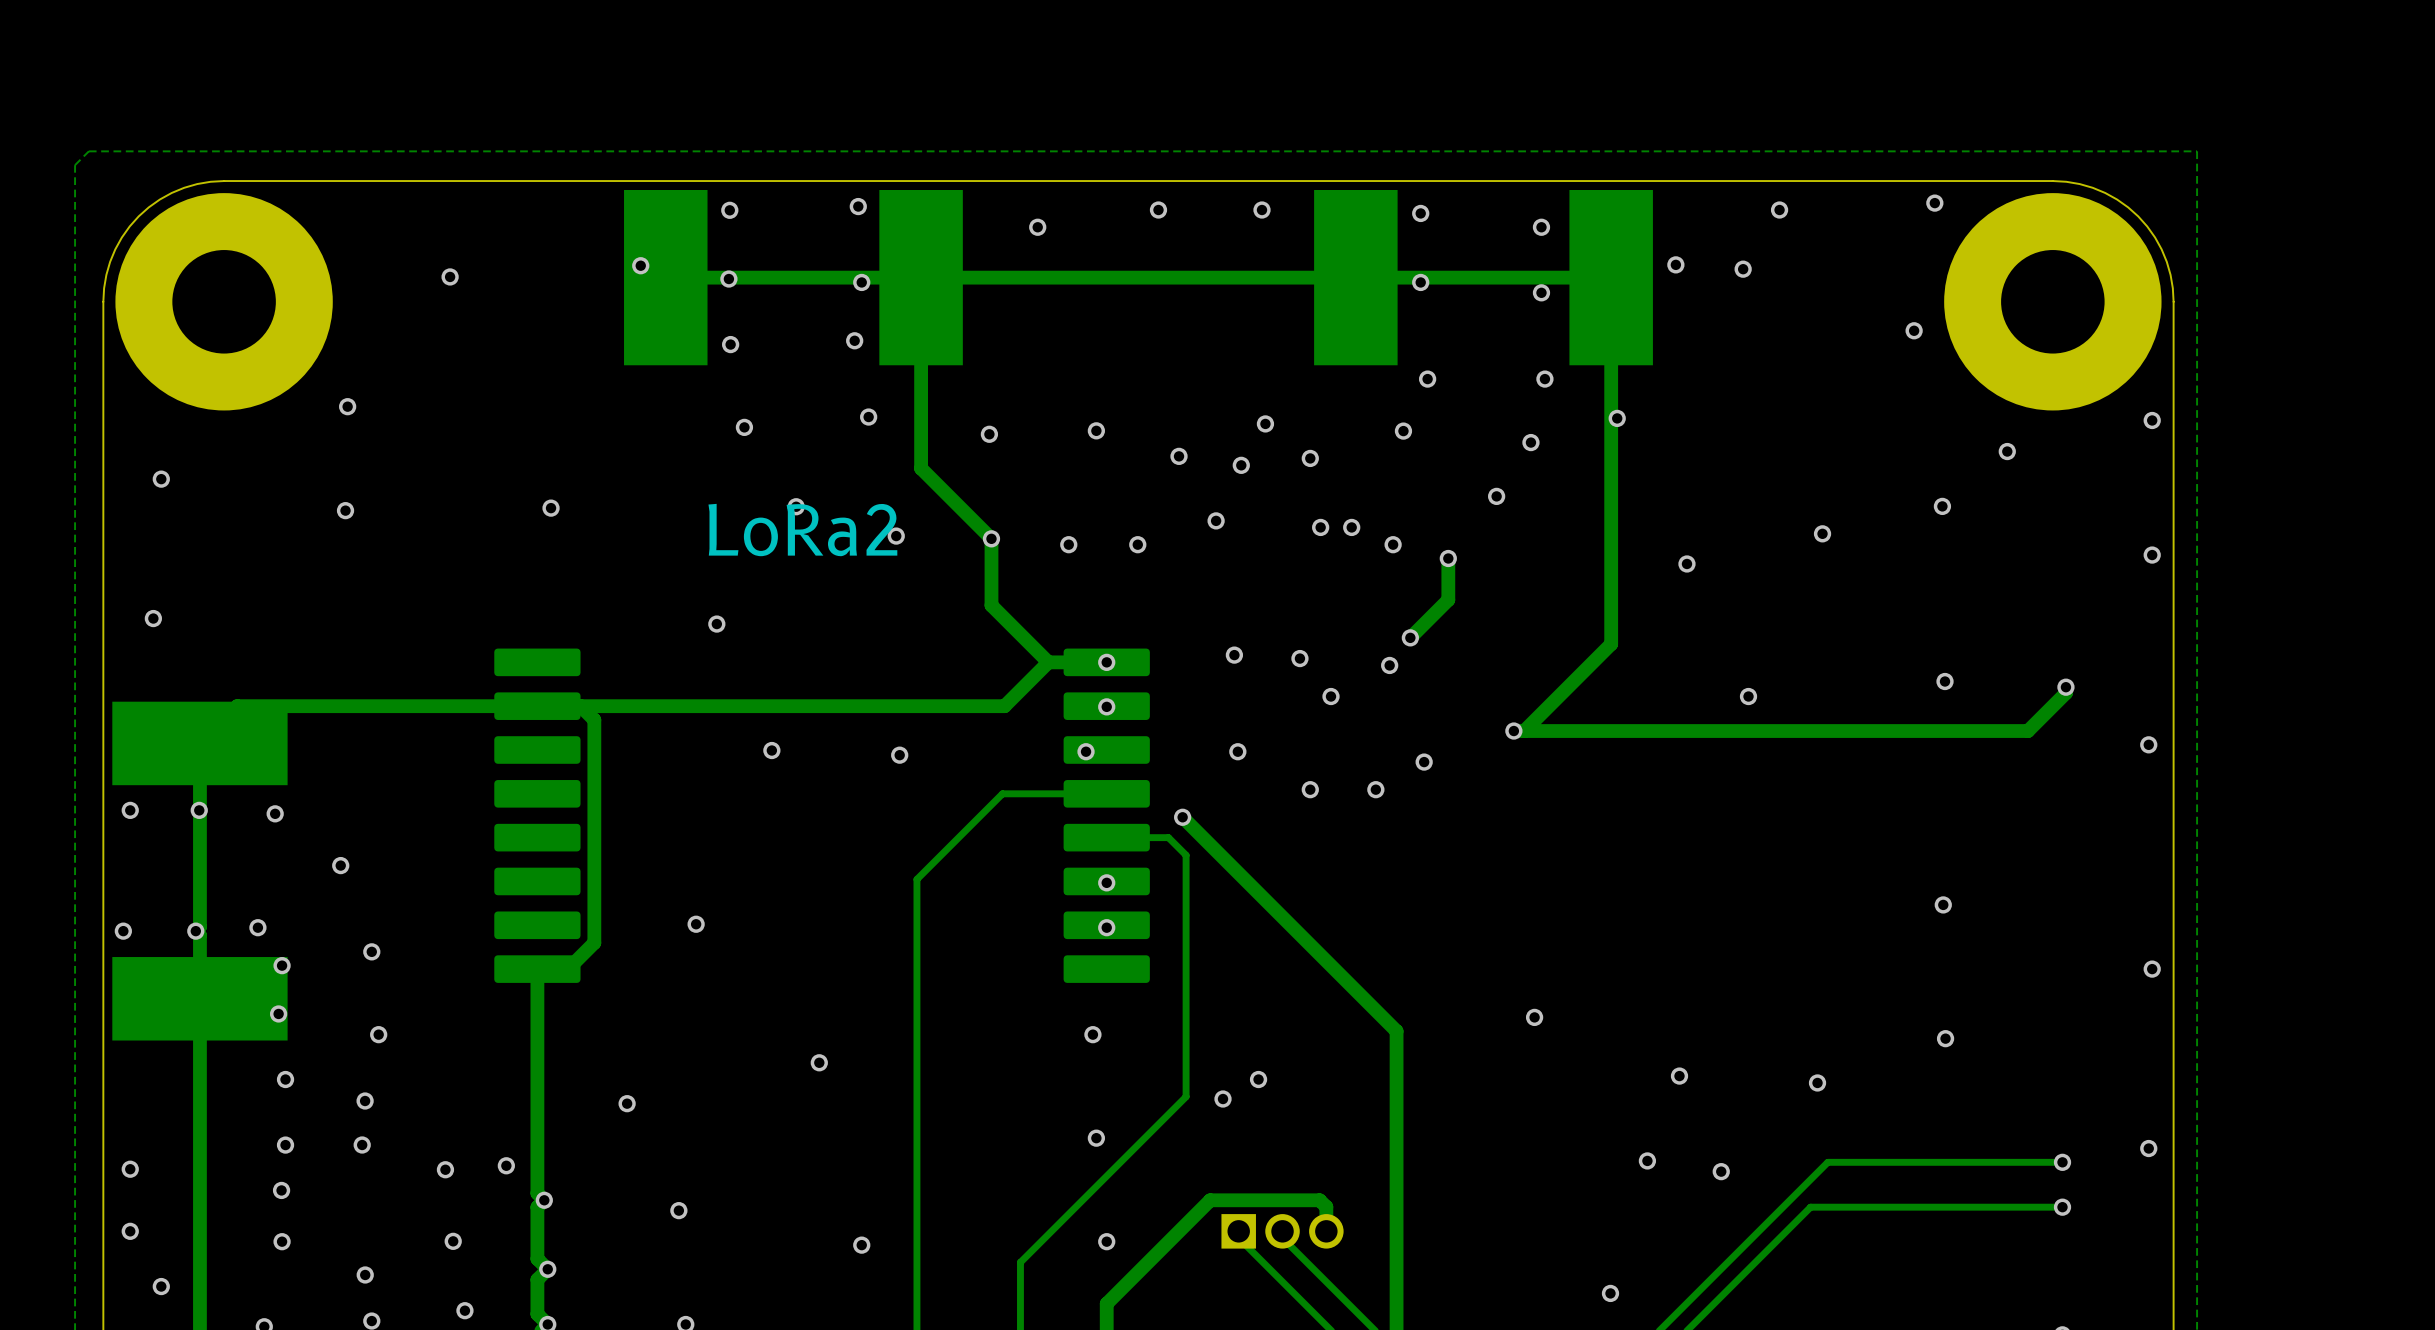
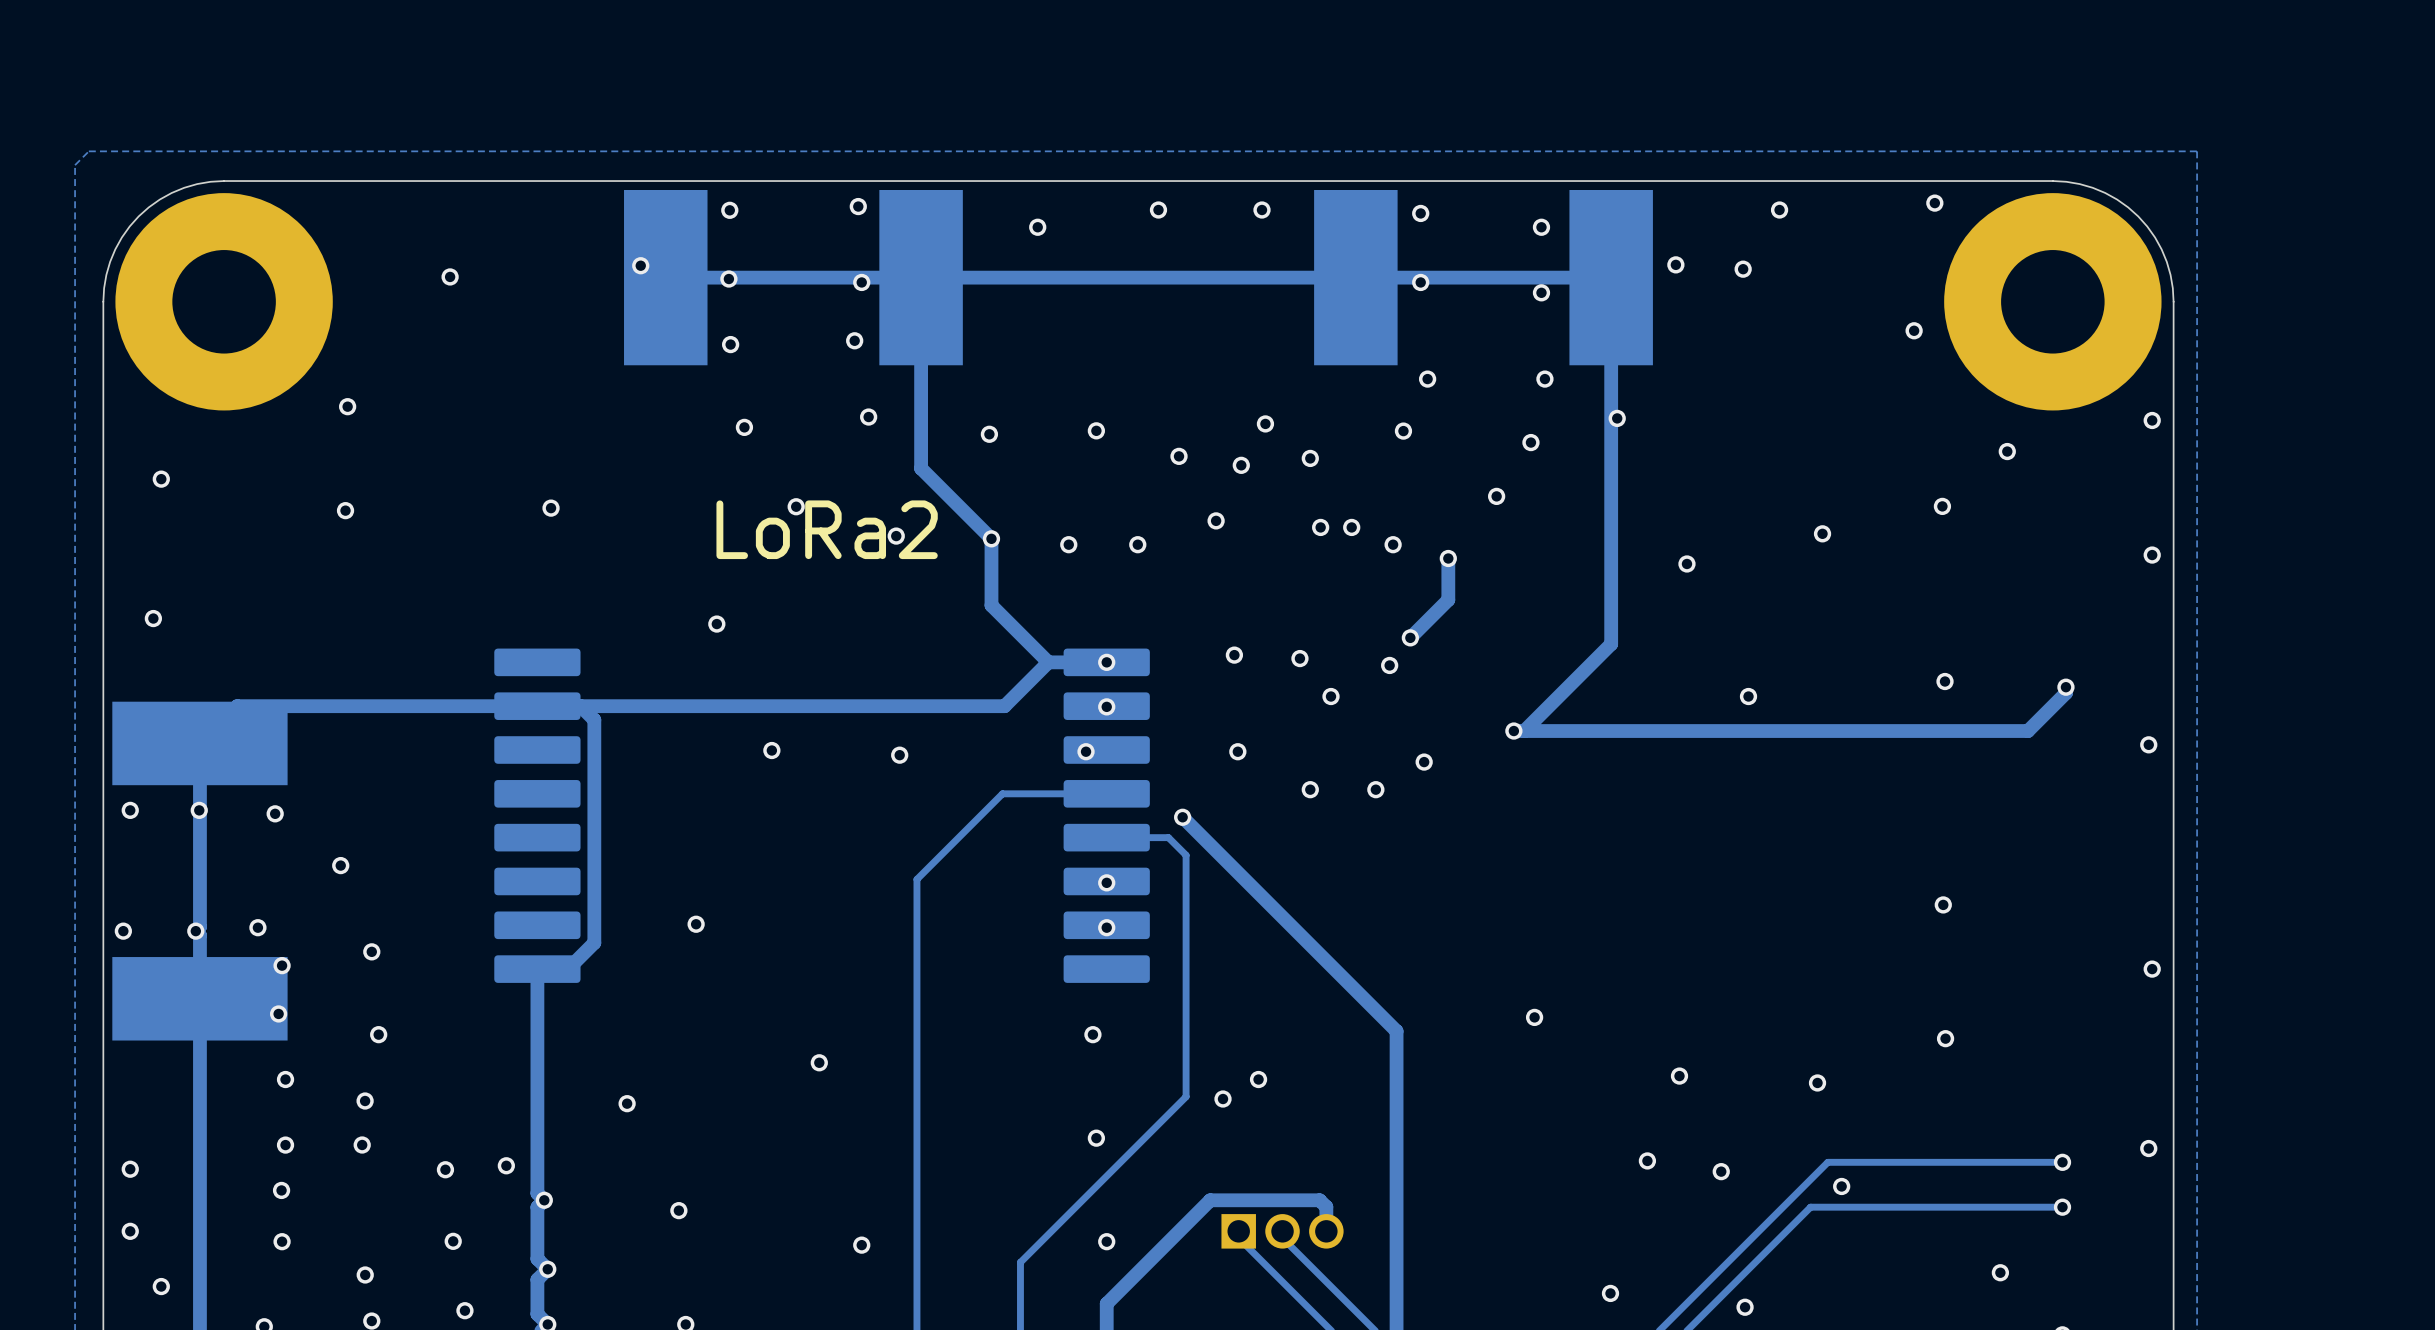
via: none -> (1841, 1186)
via: none -> (2000, 1272)
via: none -> (1745, 1307)

